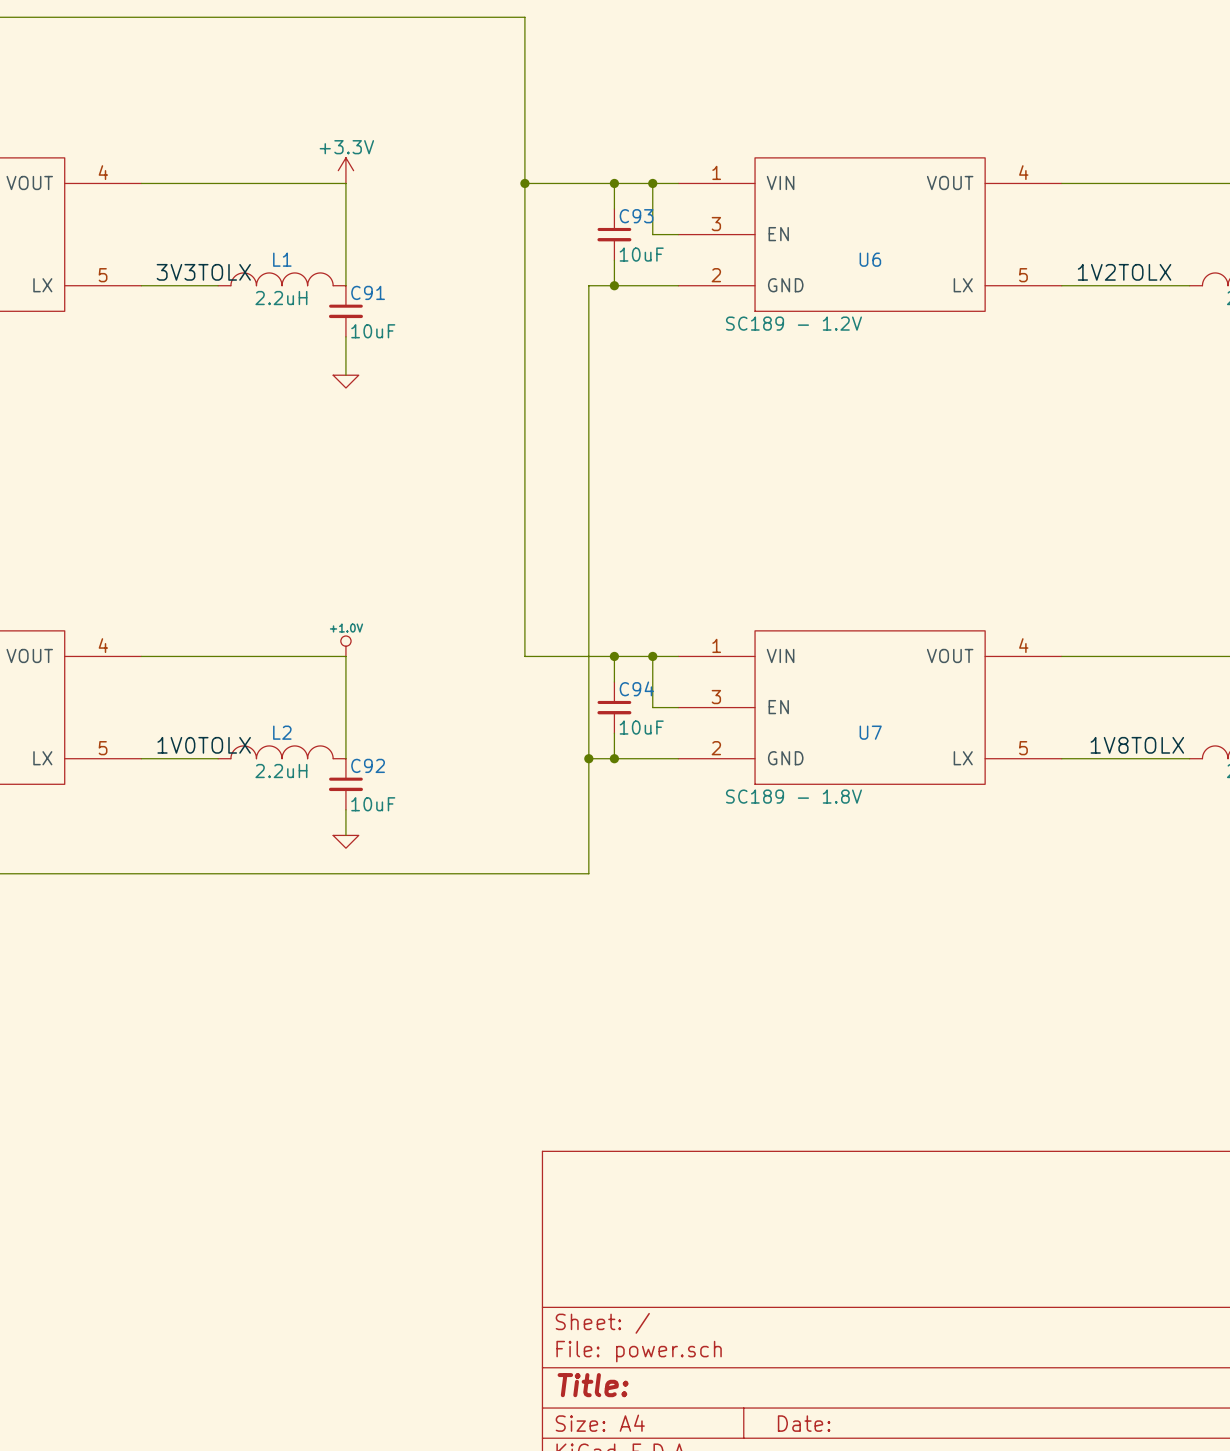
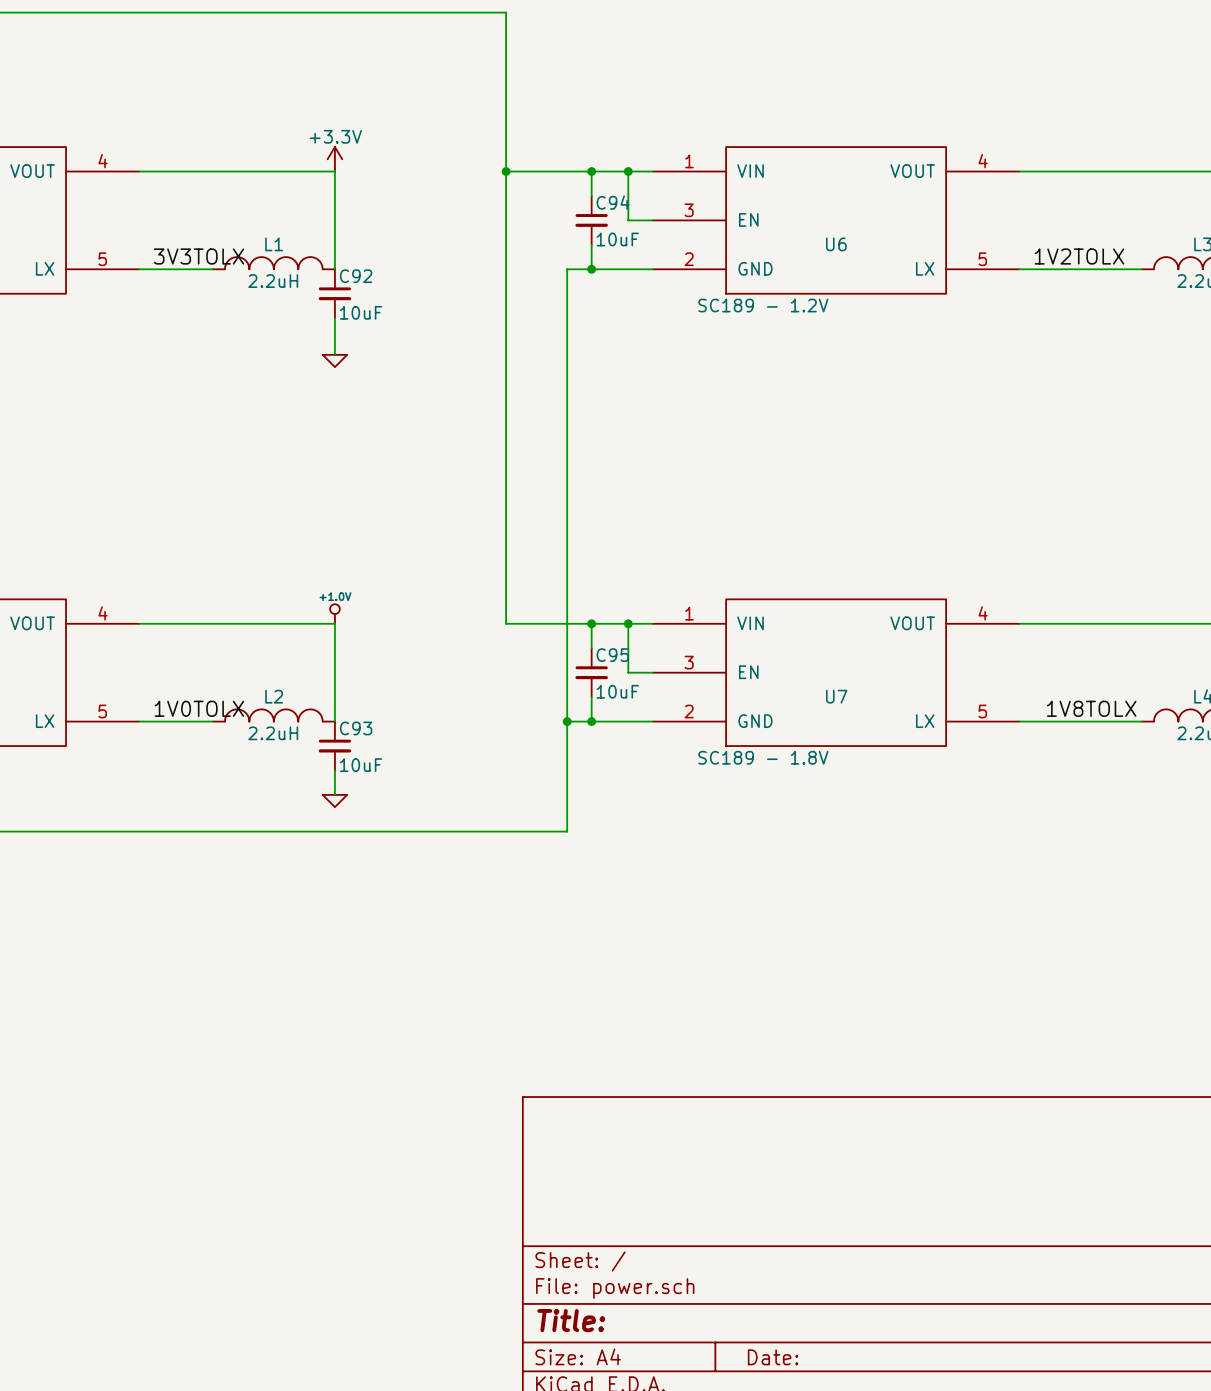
C93 name: C93 (636, 216) -> C94 (613, 202)
C91 name: C91 (368, 292) -> C92 (356, 276)
C94 name: C94 (636, 688) -> C95 (612, 655)
C92 name: C92 (368, 765) -> C93 (356, 728)

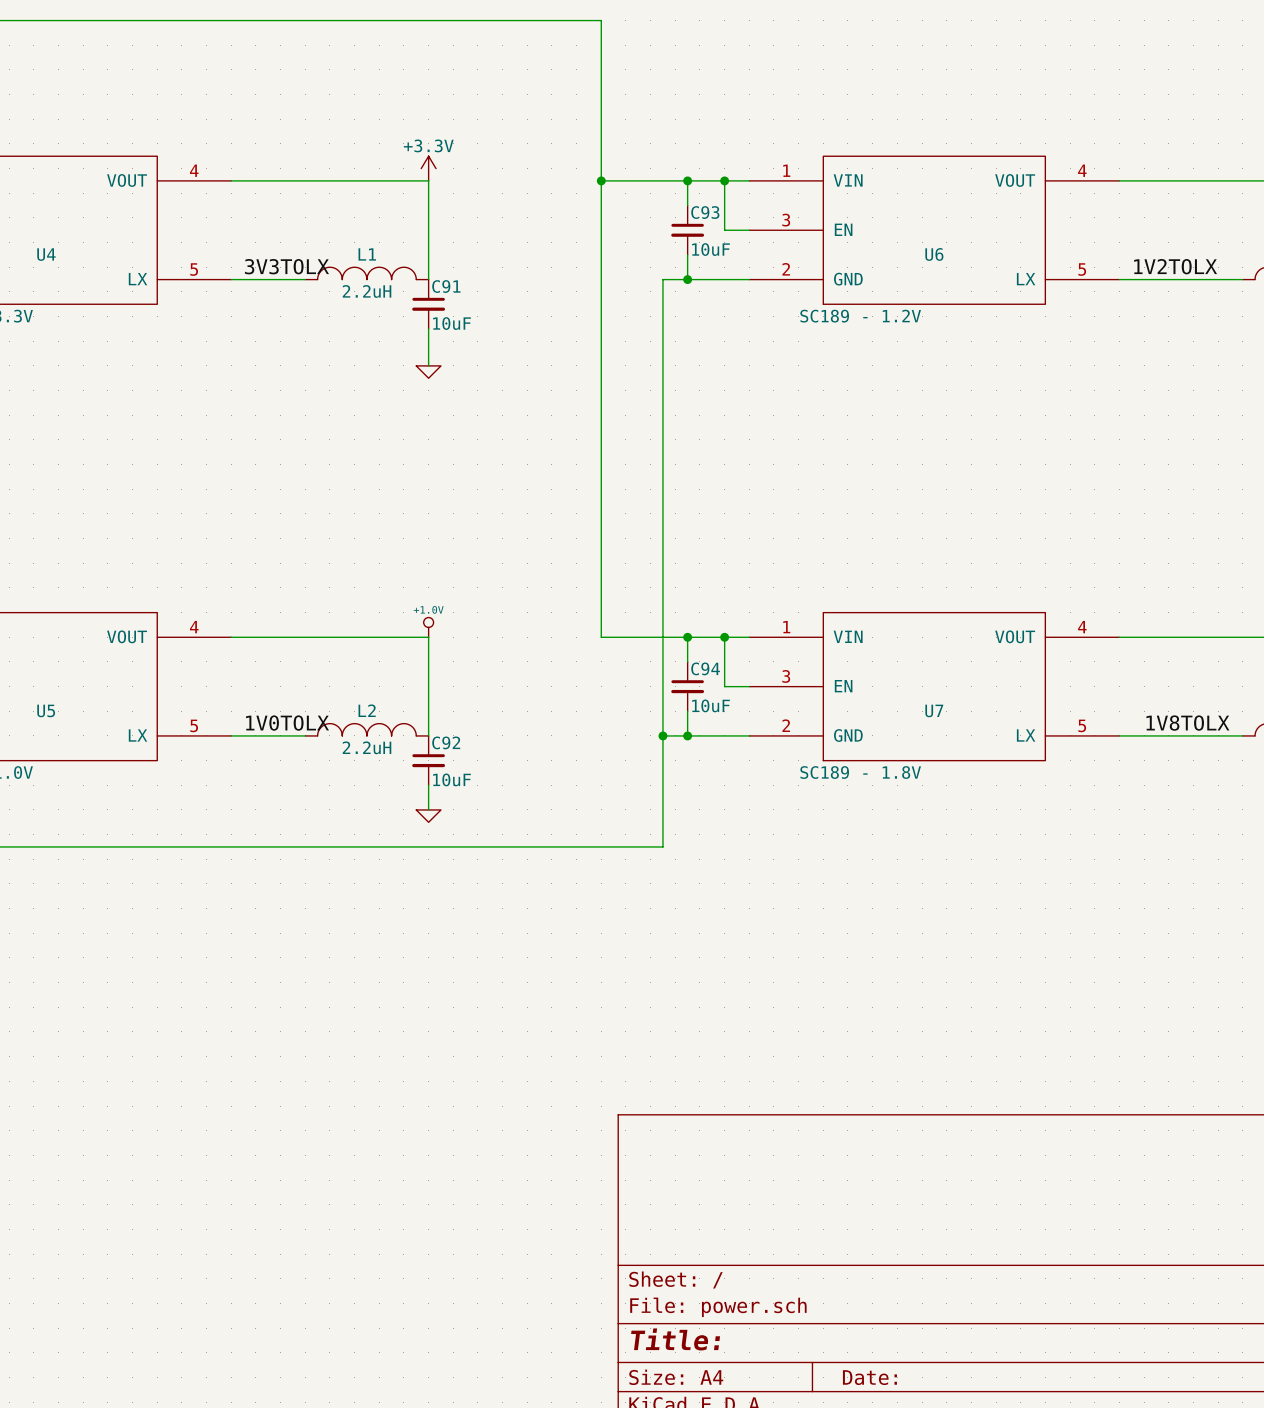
C94 name: C94 (613, 202) -> C93 (705, 212)
C92 name: C92 (356, 276) -> C91 (446, 286)
C95 name: C95 (612, 655) -> C94 (705, 668)
C93 name: C93 (356, 728) -> C92 (446, 742)

